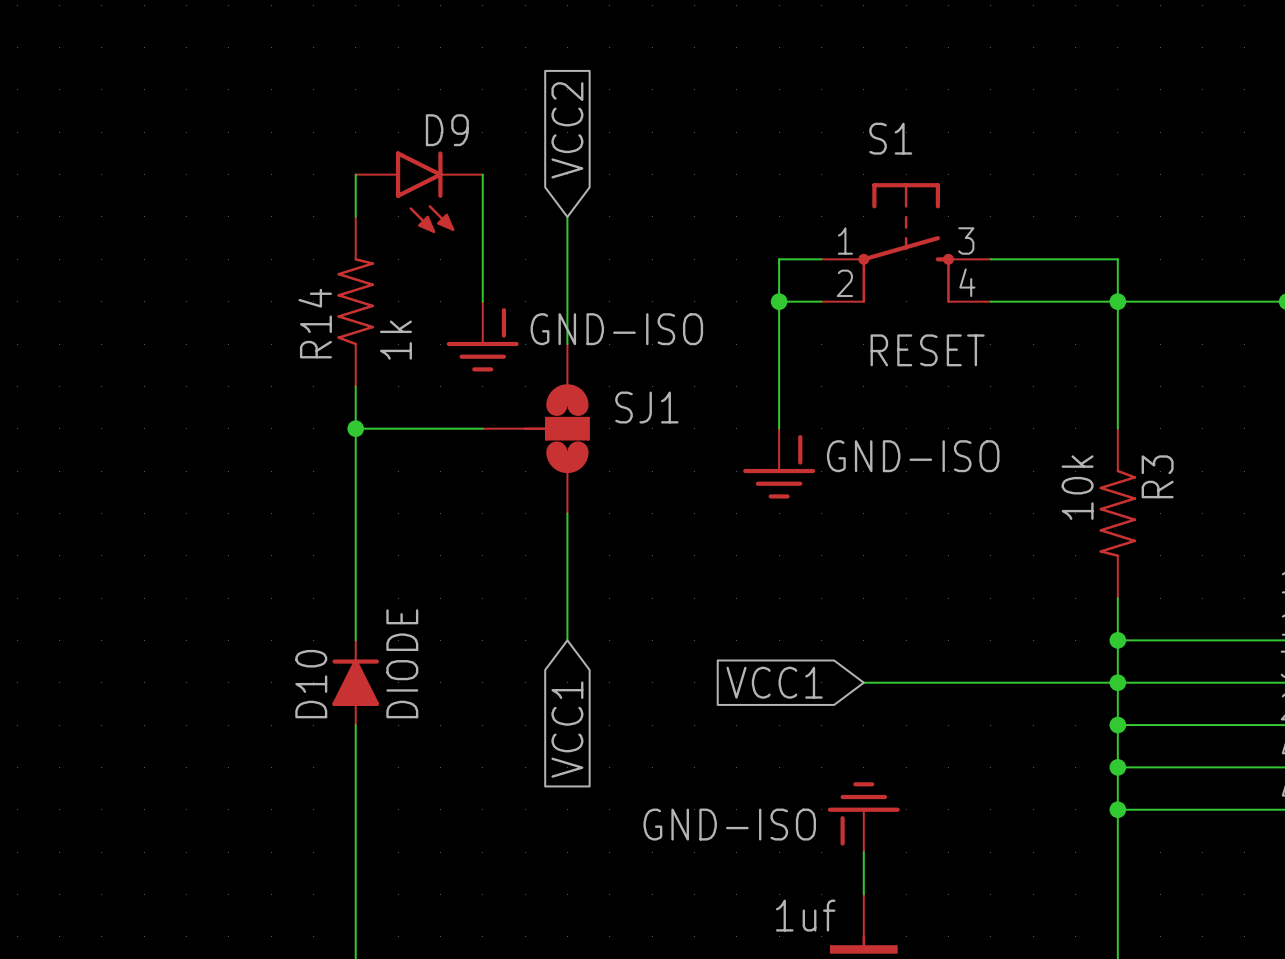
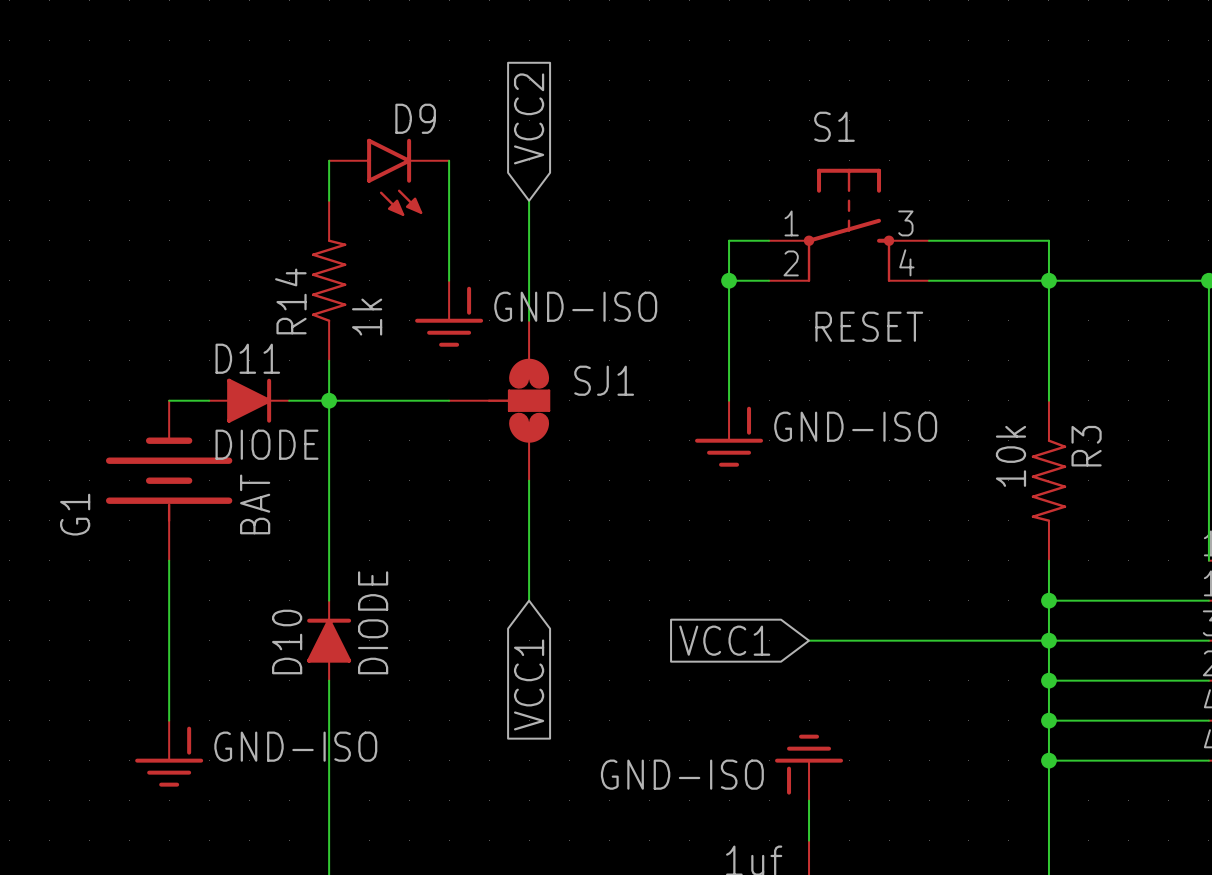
wire: none -> (169, 400) (209, 400)
D11: none -> DIODE (249, 400)
wire: none -> (289, 400) (329, 400)
G1: none -> BAT (169, 480)
wire: none -> (169, 560) (169, 720)
power symbol: none -> GND-ISO (169, 753)

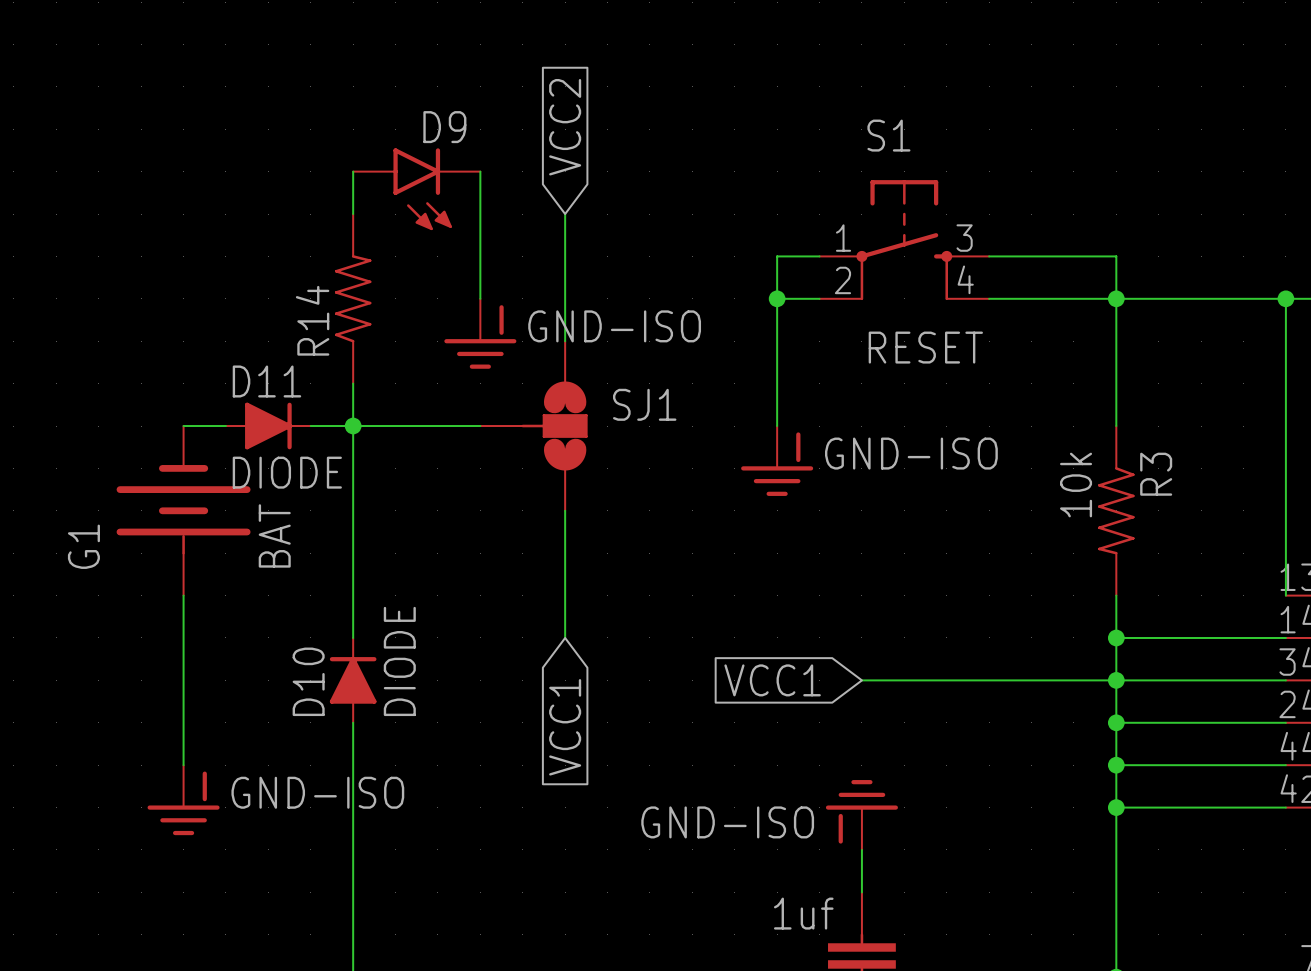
R14 value: 1k (367, 317) -> none

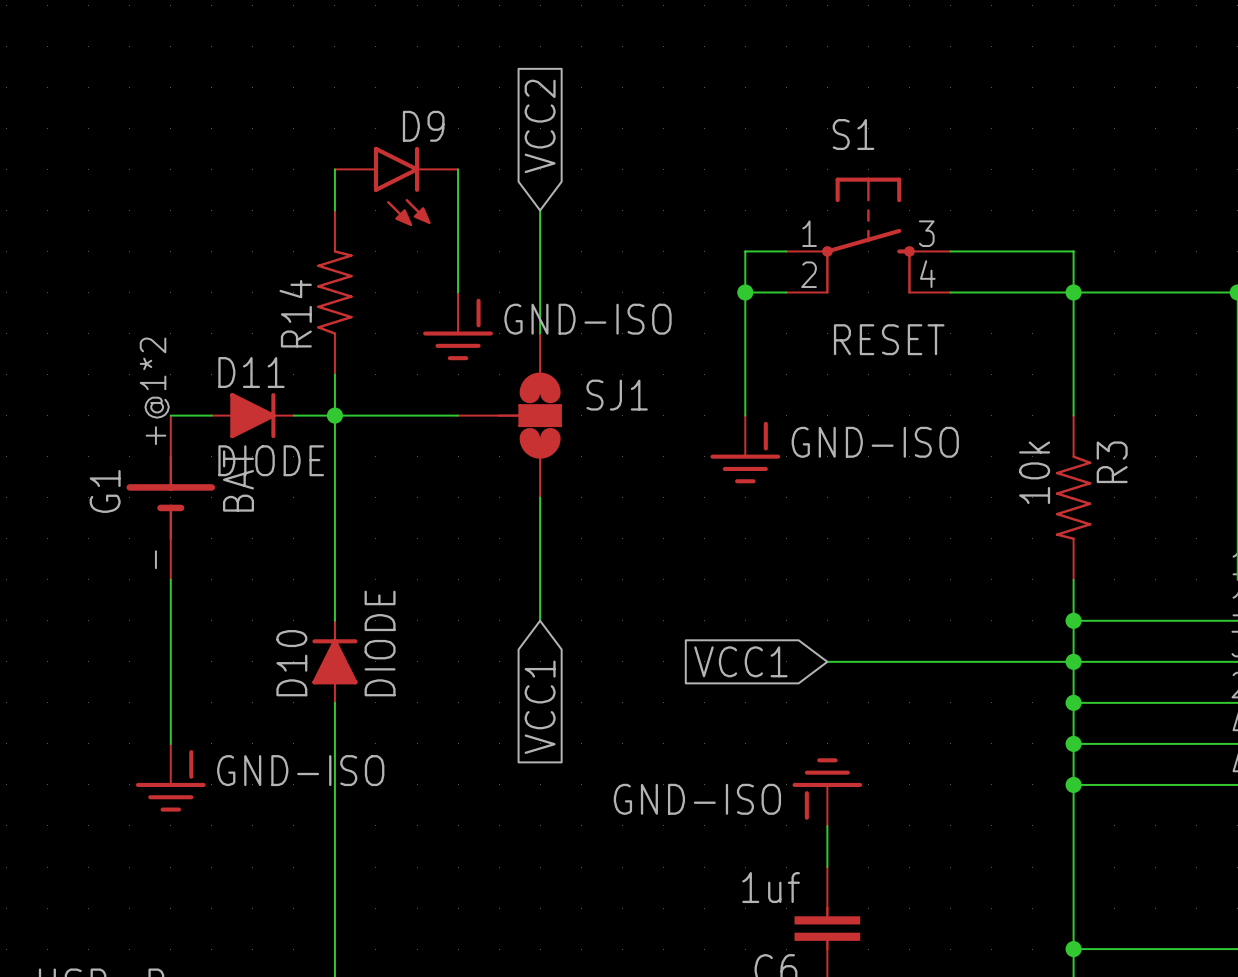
G1 symbol: [116, 426, 251, 596] -> [126, 415, 216, 580]
G1 value position: BAT (274, 535) -> BAT (238, 480)
G1 name position: G1 (83, 546) -> G1 (105, 491)

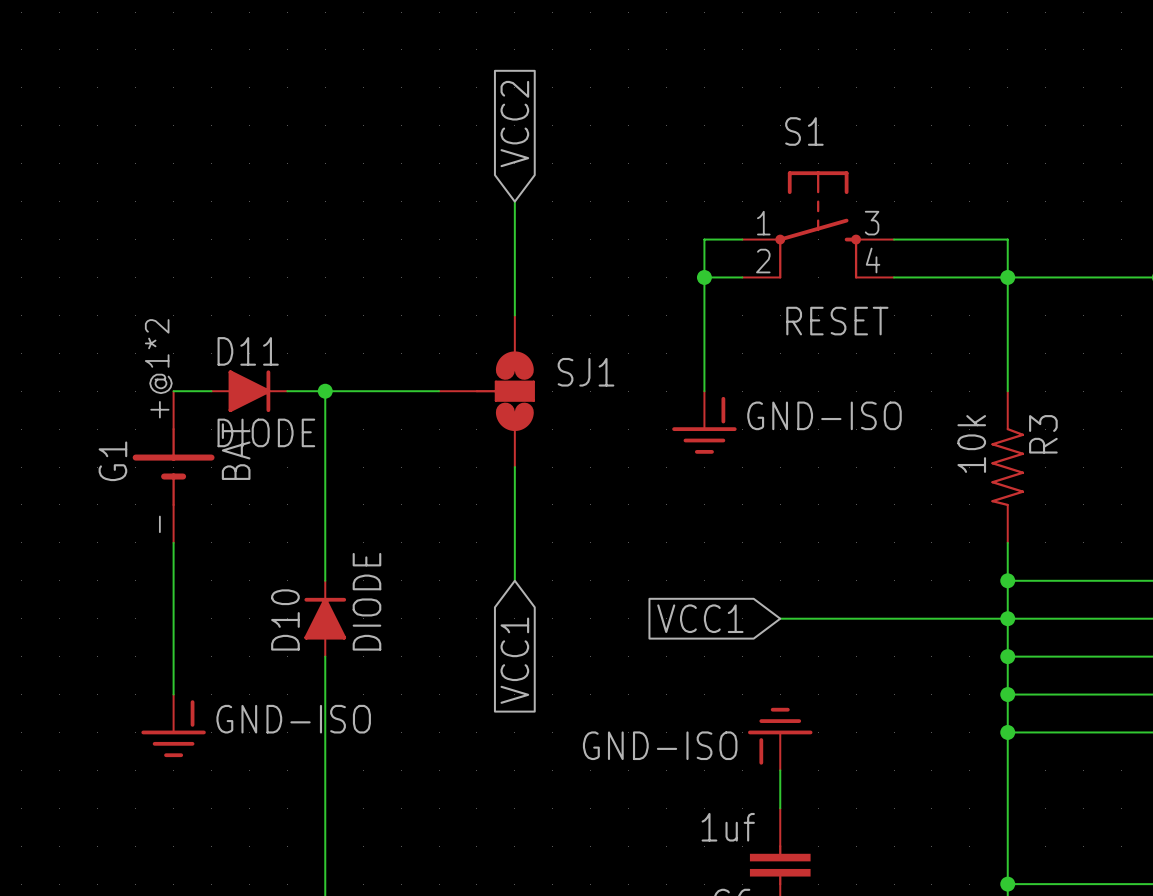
wire: (334, 169) (334, 210) -> none
wire: (458, 169) (458, 292) -> none
D9: (396, 186) -> none
R14: (334, 292) -> none
power symbol: GND-ISO (458, 326) -> none
wire: (334, 374) (334, 415) -> none

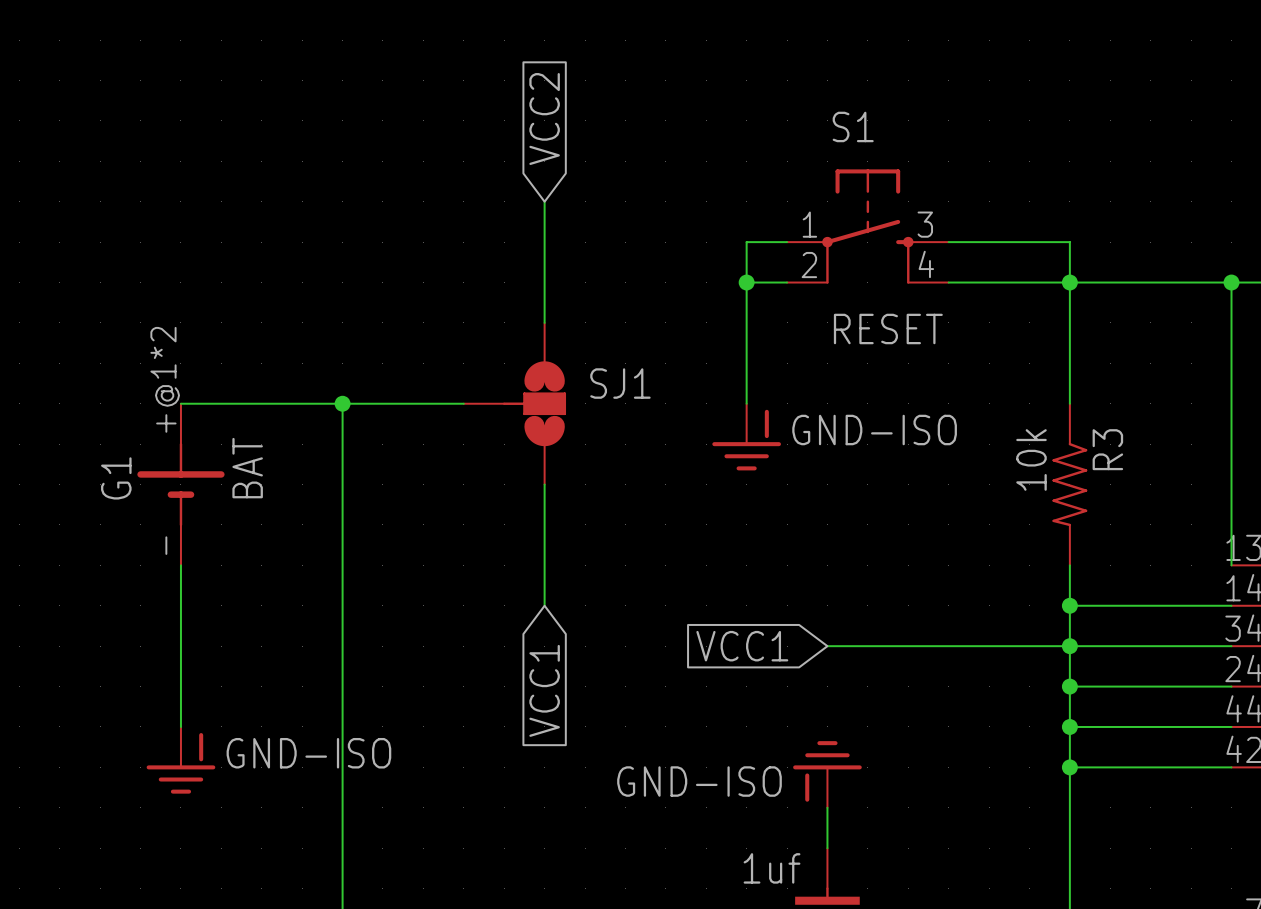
D11: DIODE (249, 391) -> none
D10: DIODE (325, 618) -> none

